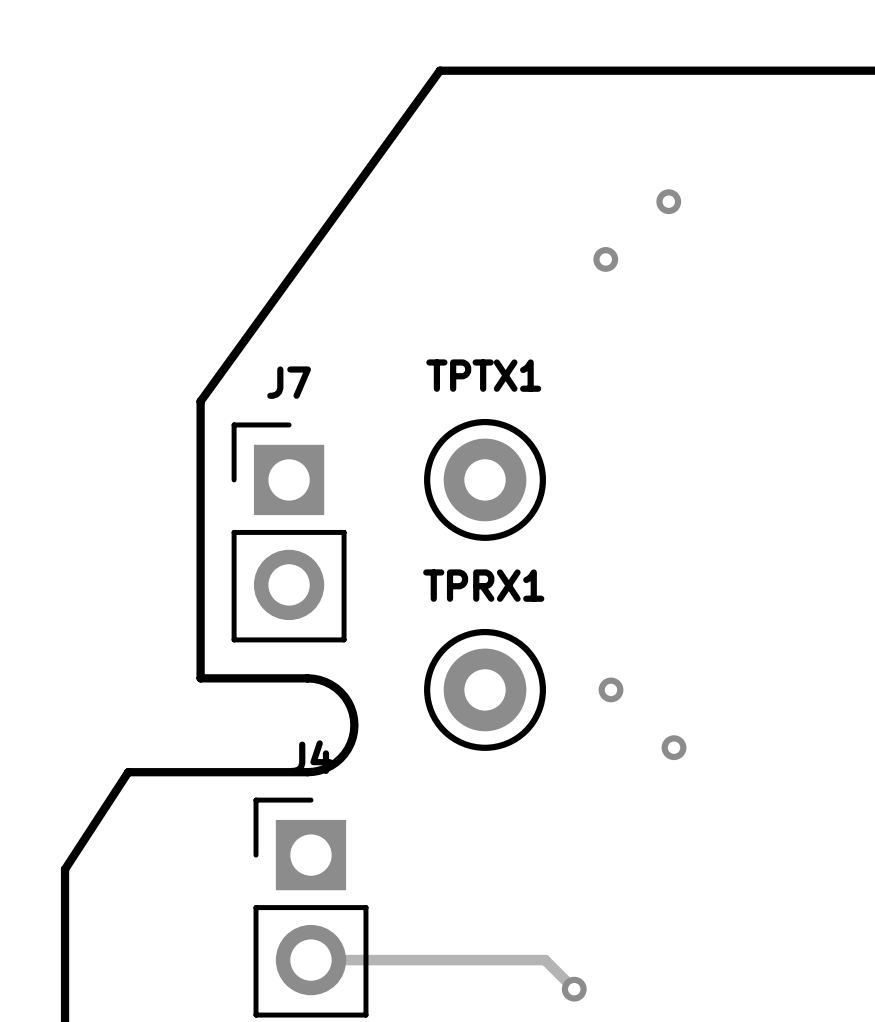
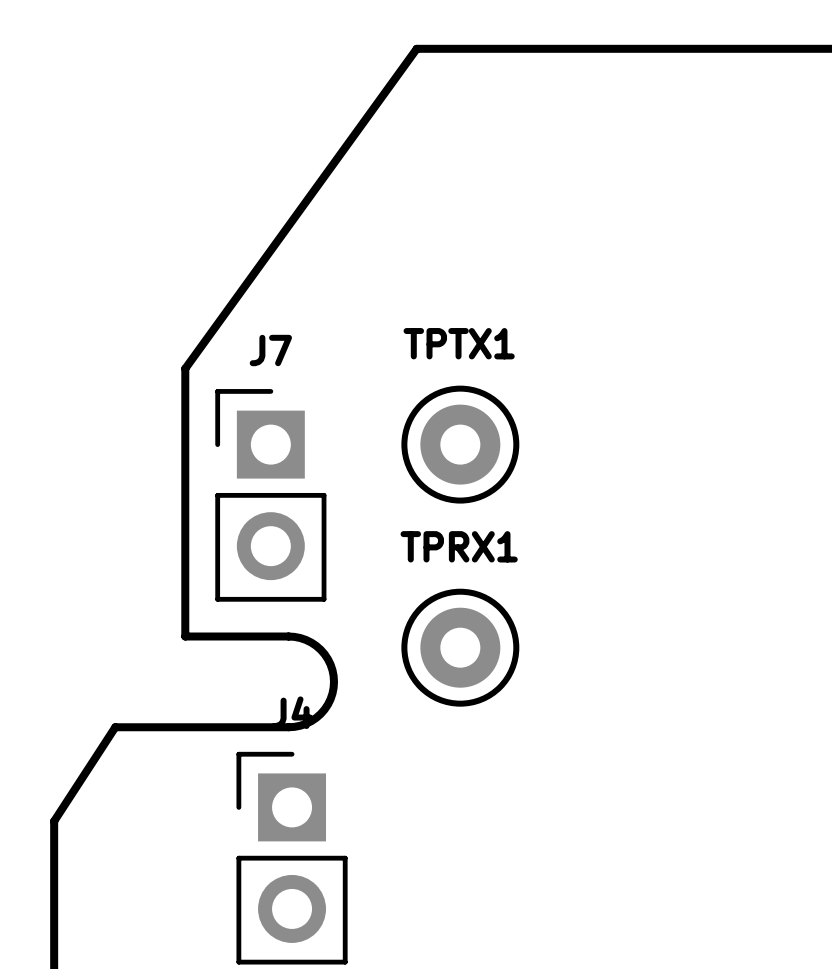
via: (668, 201) -> none
via: (605, 259) -> none
via: (611, 689) -> none
via: (674, 747) -> none
track: (310, 960) (545, 960) (574, 989) -> none
via: (574, 989) -> none

